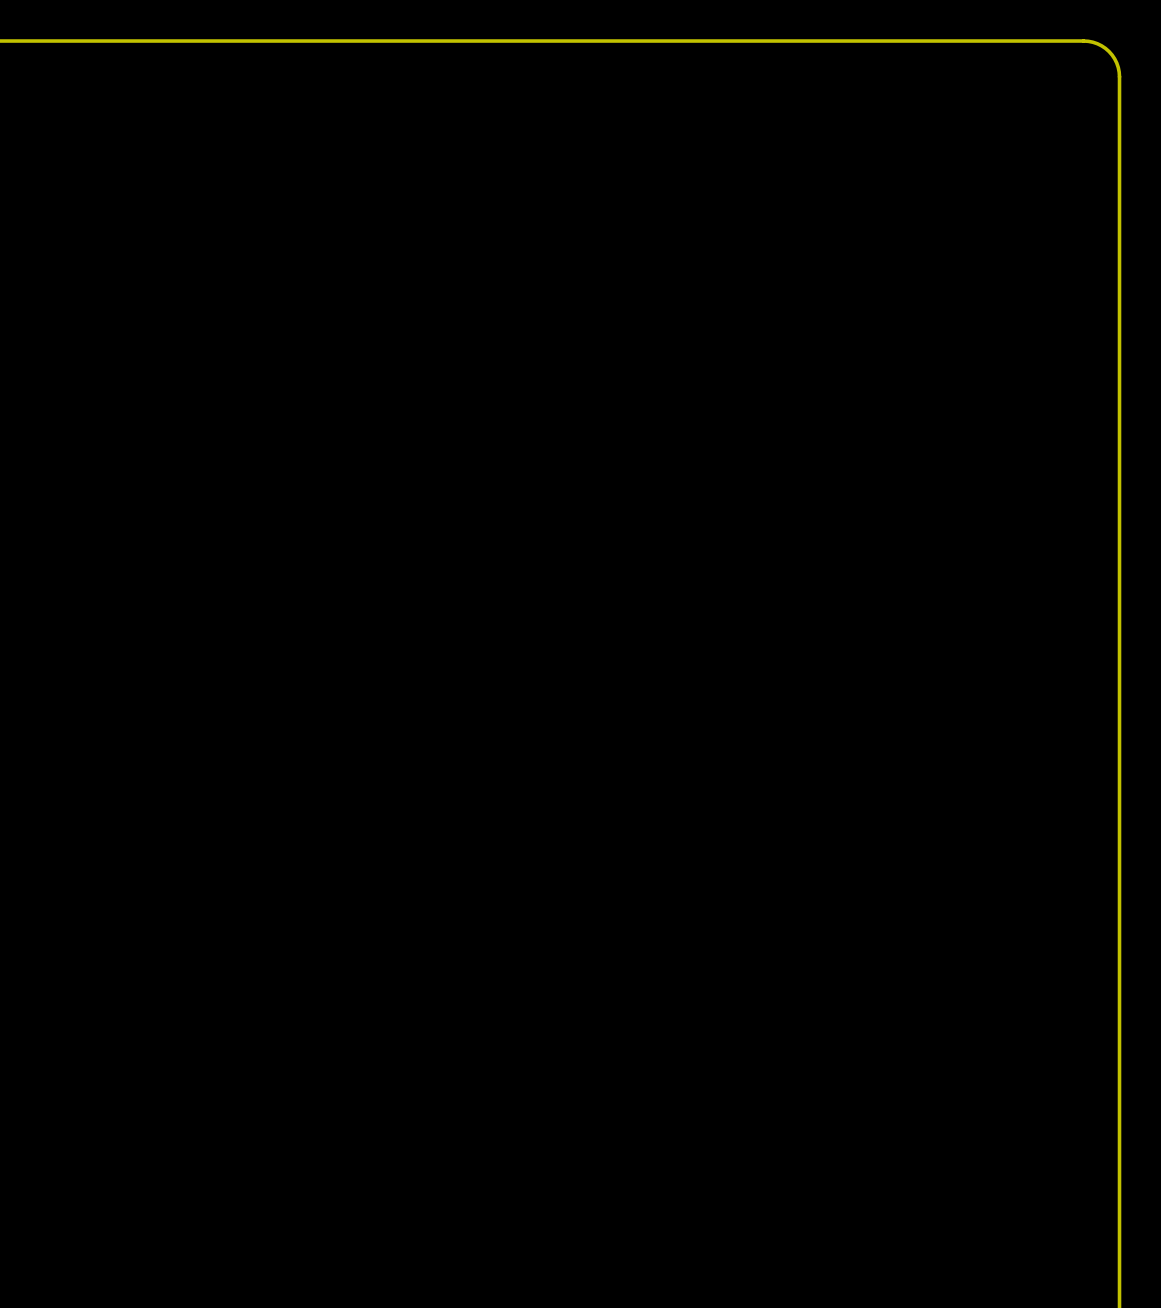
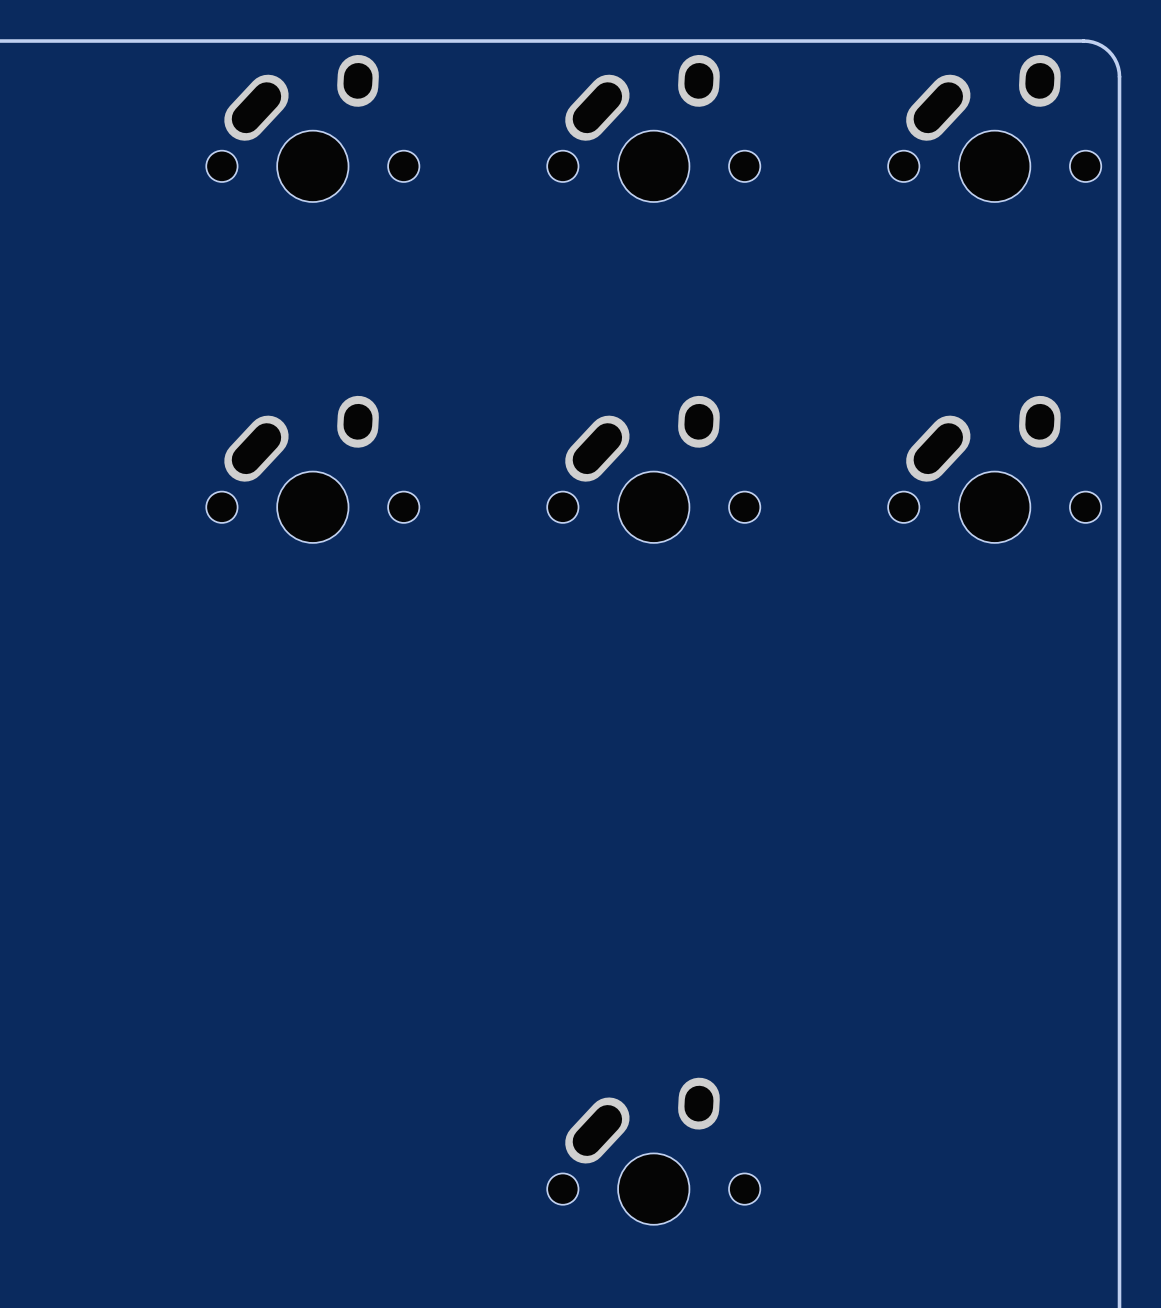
part: none -> (312, 128)
part: none -> (653, 128)
part: none -> (994, 128)
part: none -> (312, 469)
part: none -> (653, 469)
part: none -> (994, 469)
part: none -> (653, 1151)

